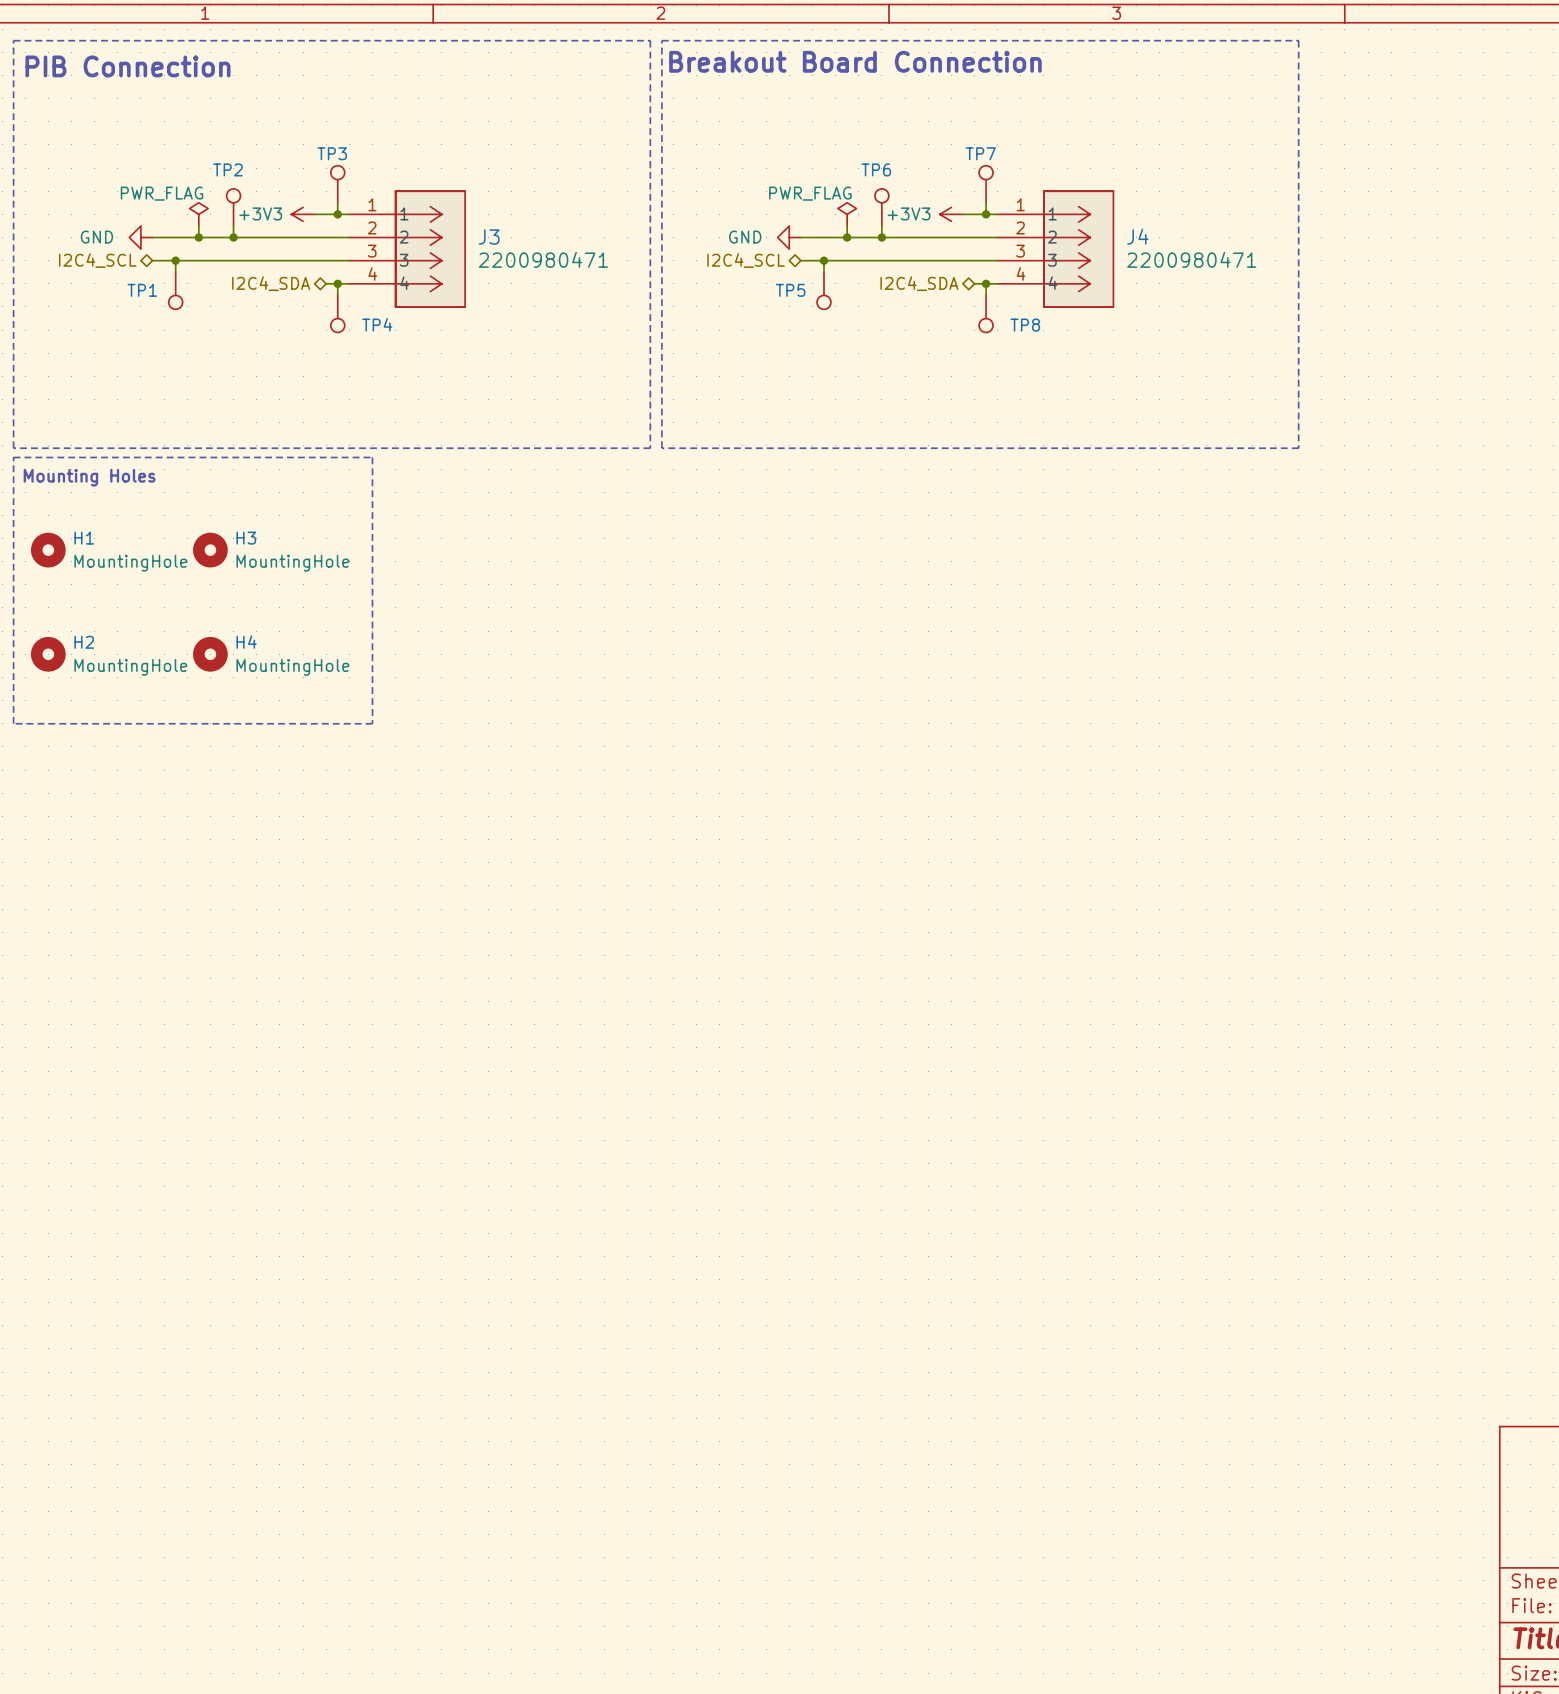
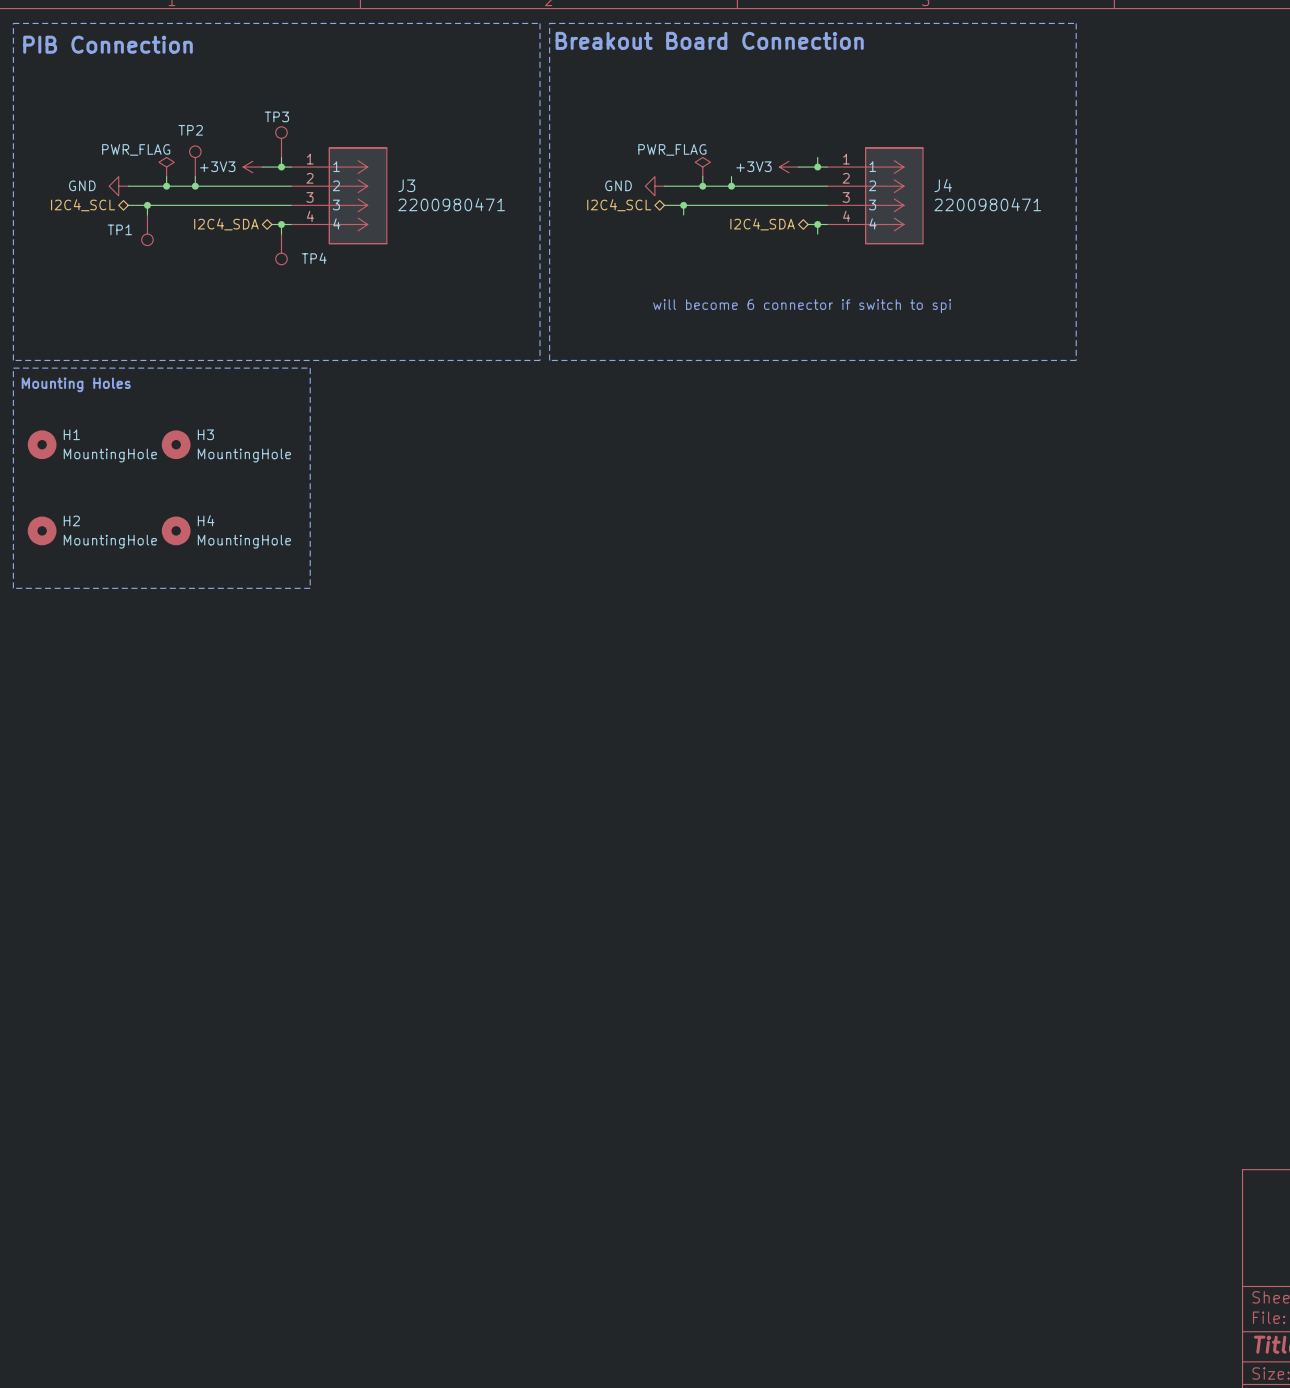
TP7: (986, 184) -> none
TP6: (881, 207) -> none
TP5: (823, 290) -> none
TP8: (986, 313) -> none
text: none -> will become 6 connector if switch to spi (802, 306)

